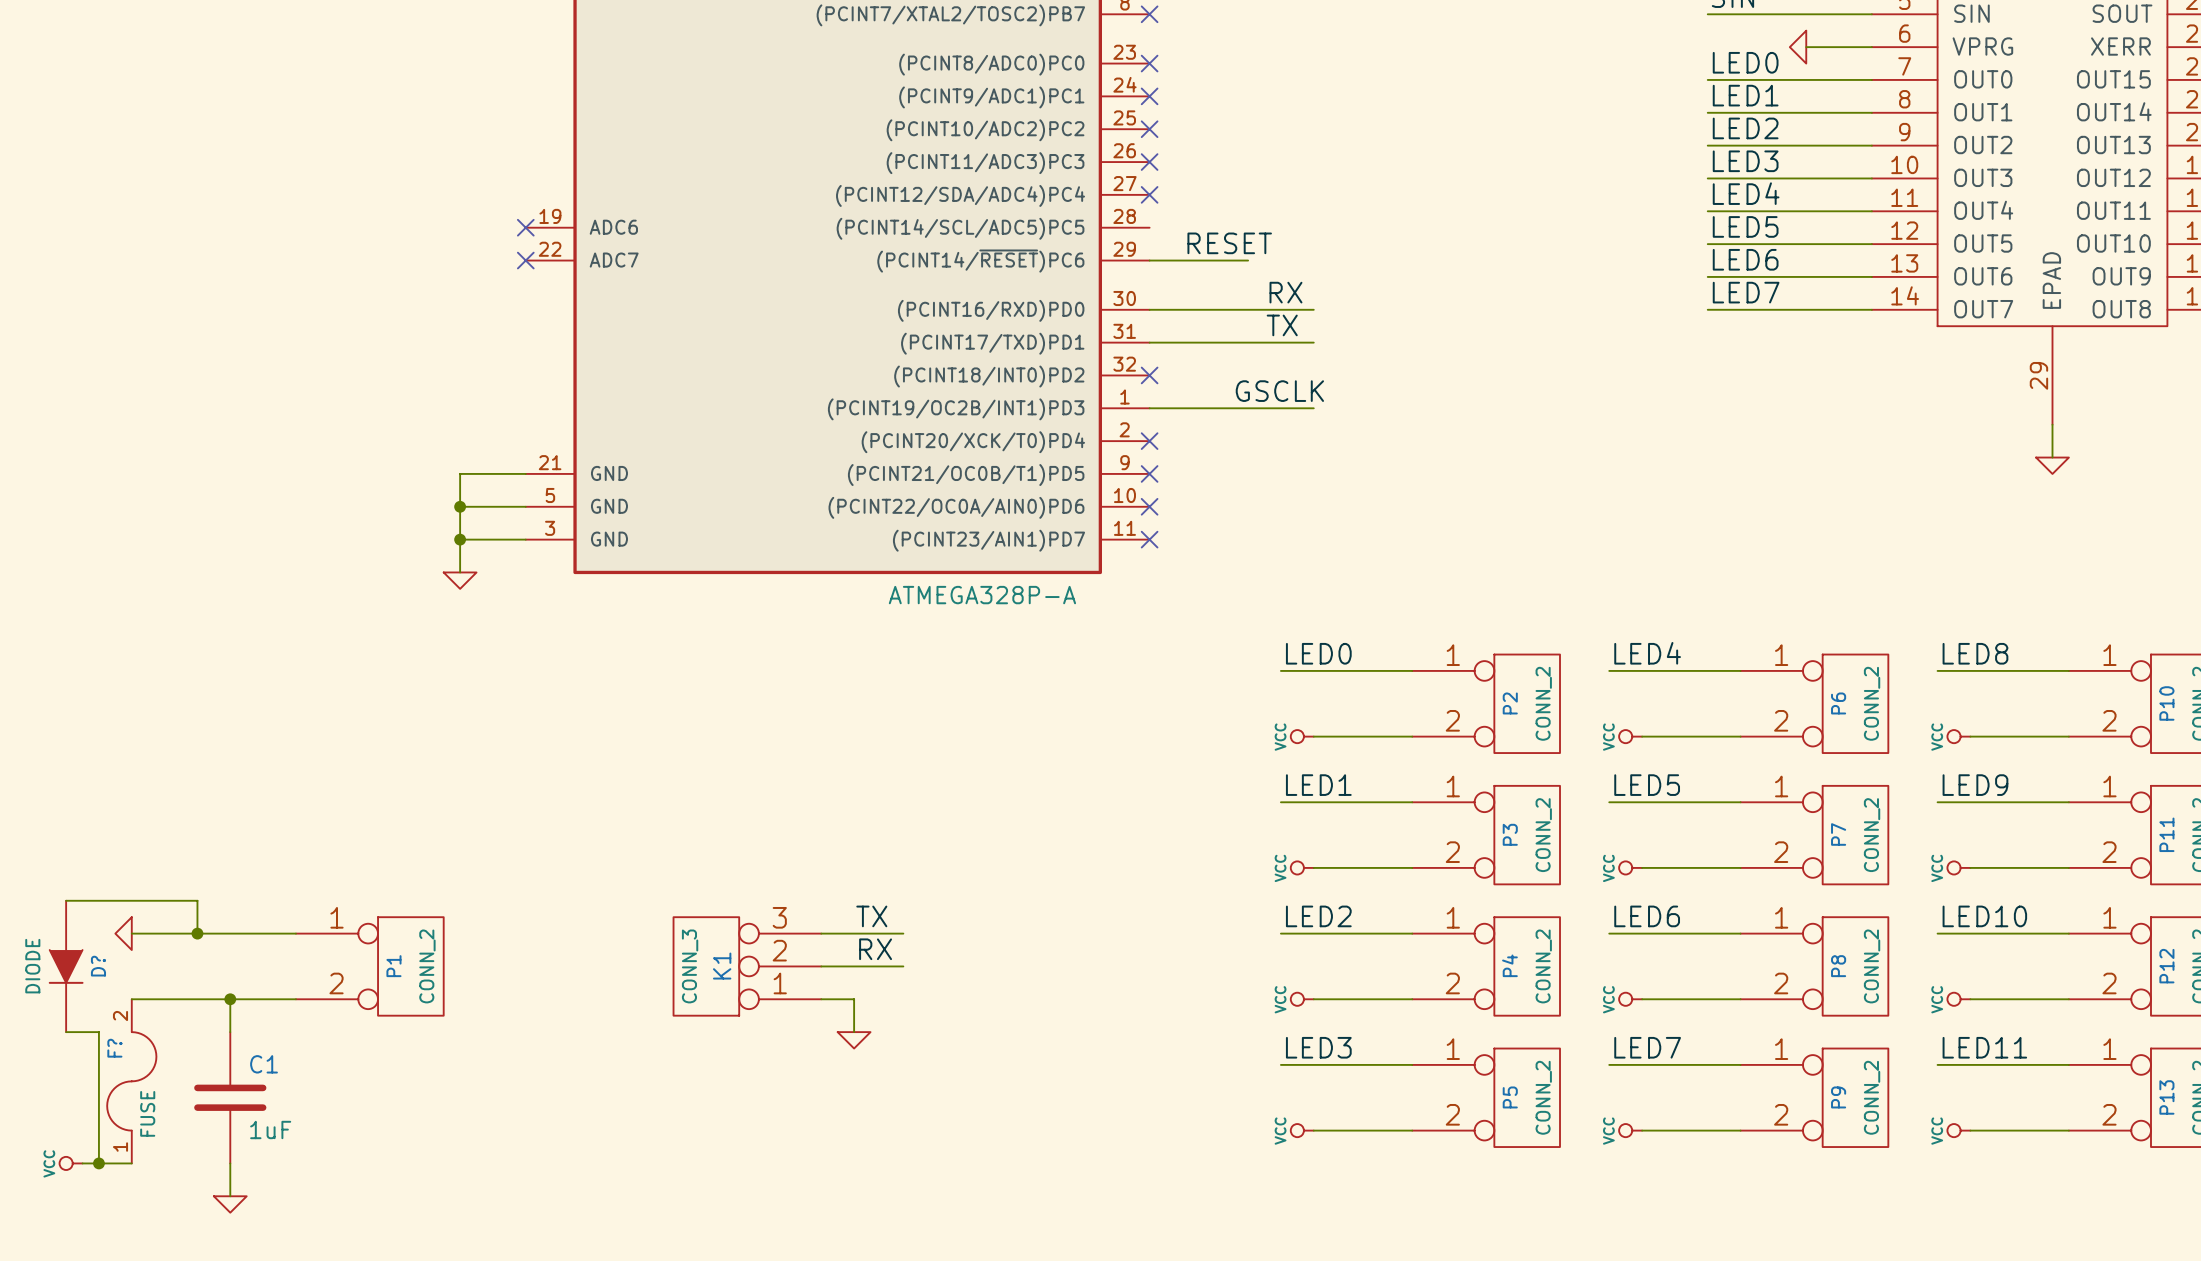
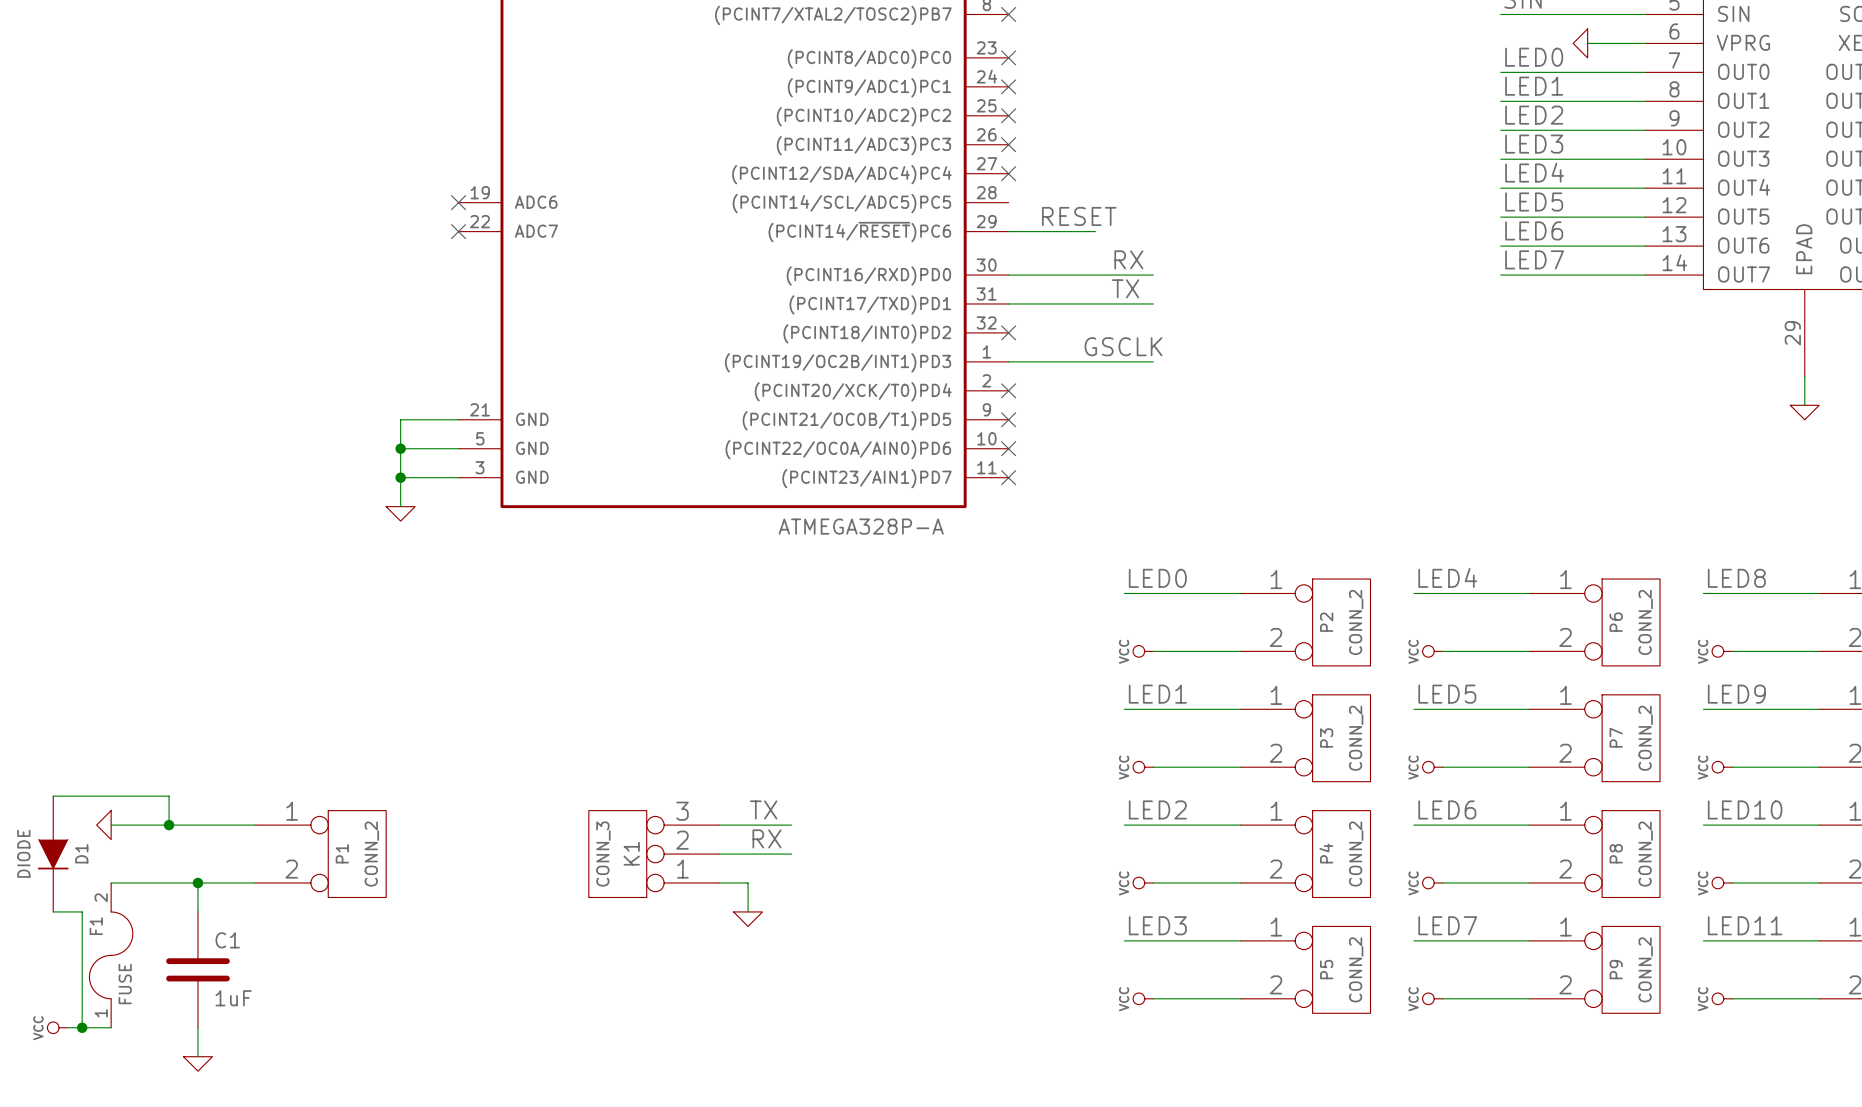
D? name: D? (98, 966) -> D1 (81, 853)
F? name: F? (114, 1048) -> F1 (96, 926)

